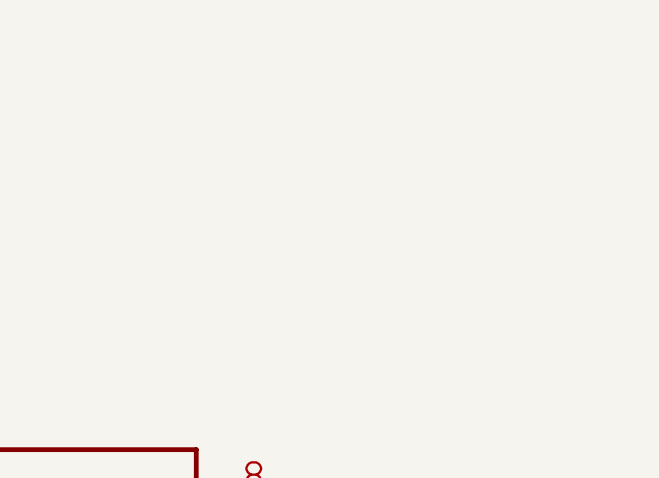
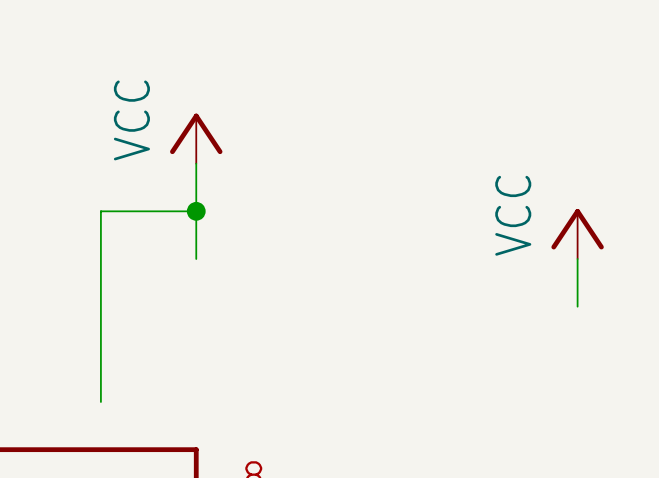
power symbol: none -> VCC (196, 138)
wire: none -> (196, 163) (196, 258)
wire: none -> (196, 211) (100, 211) (100, 401)
junction: none -> (196, 211)
power symbol: none -> VCC (577, 233)
wire: none -> (577, 258) (577, 306)

